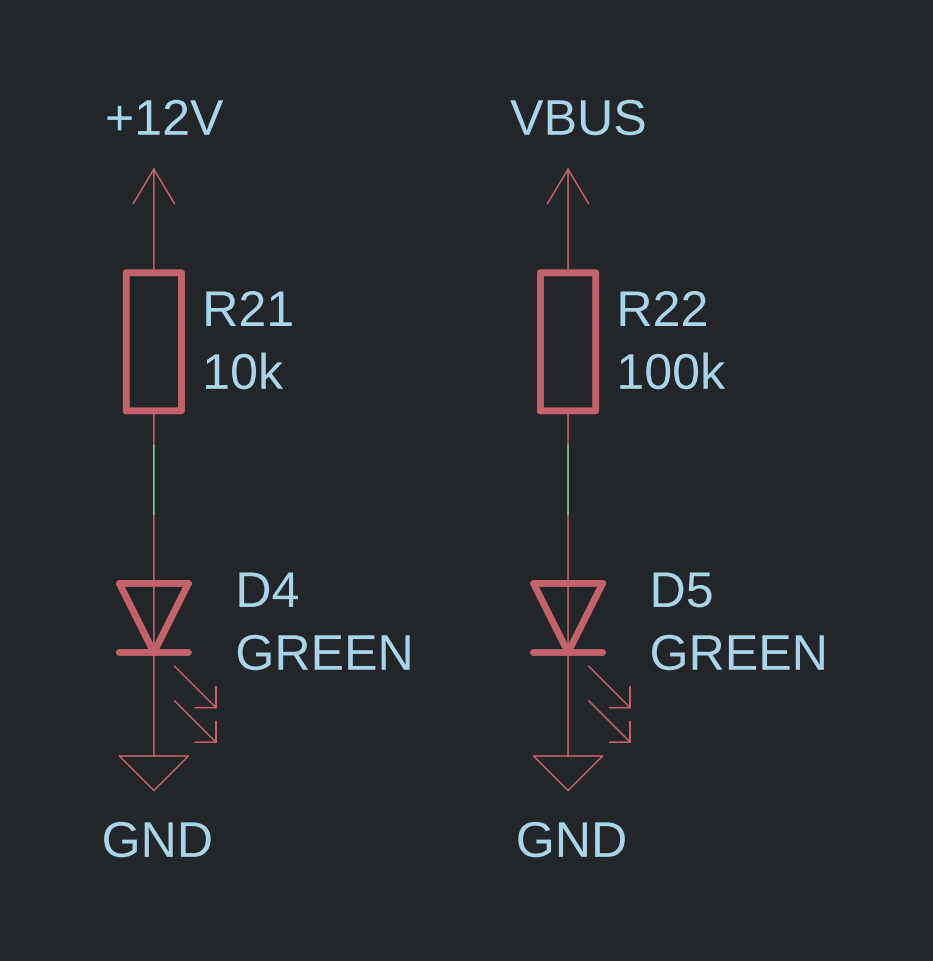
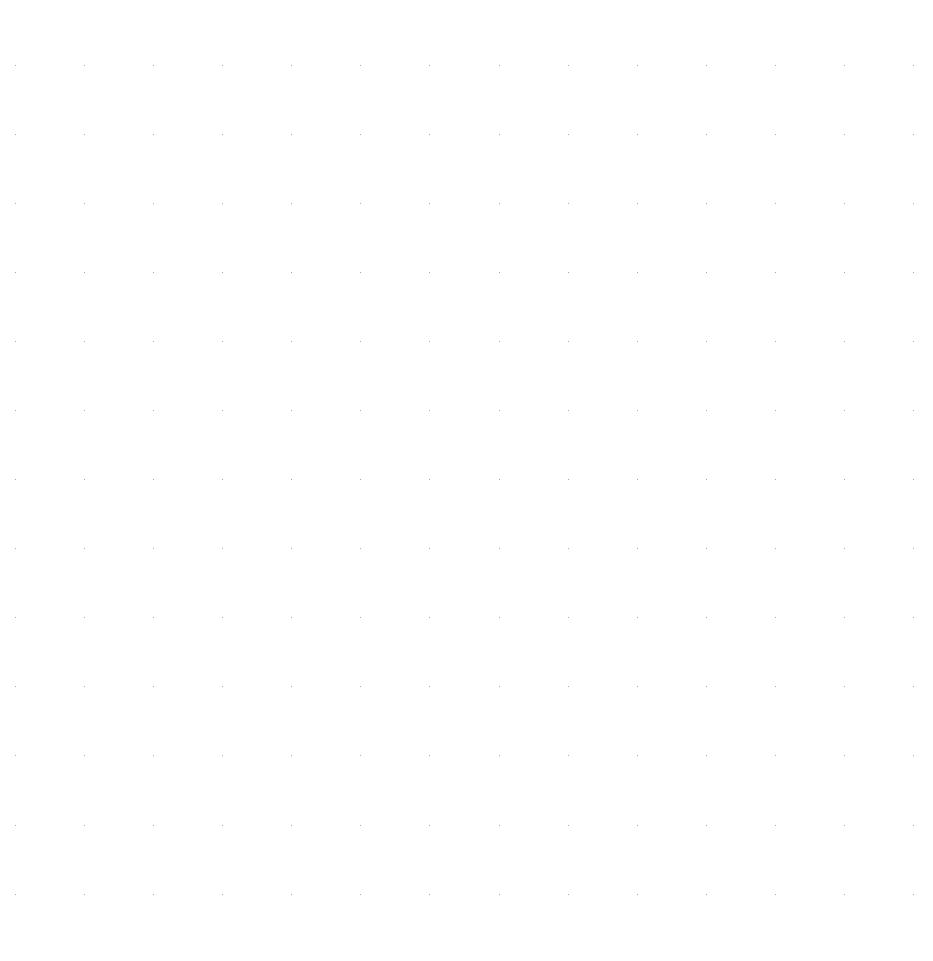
power symbol: +12V (153, 203) -> none
power symbol: VBUS (568, 203) -> none
R21: 10k (153, 341) -> none
R22: 100k (568, 341) -> none
wire: (153, 445) (153, 514) -> none
wire: (568, 445) (568, 514) -> none
D4: GREEN (165, 628) -> none
D5: GREEN (580, 628) -> none
power symbol: GND (153, 755) -> none
power symbol: GND (568, 755) -> none

